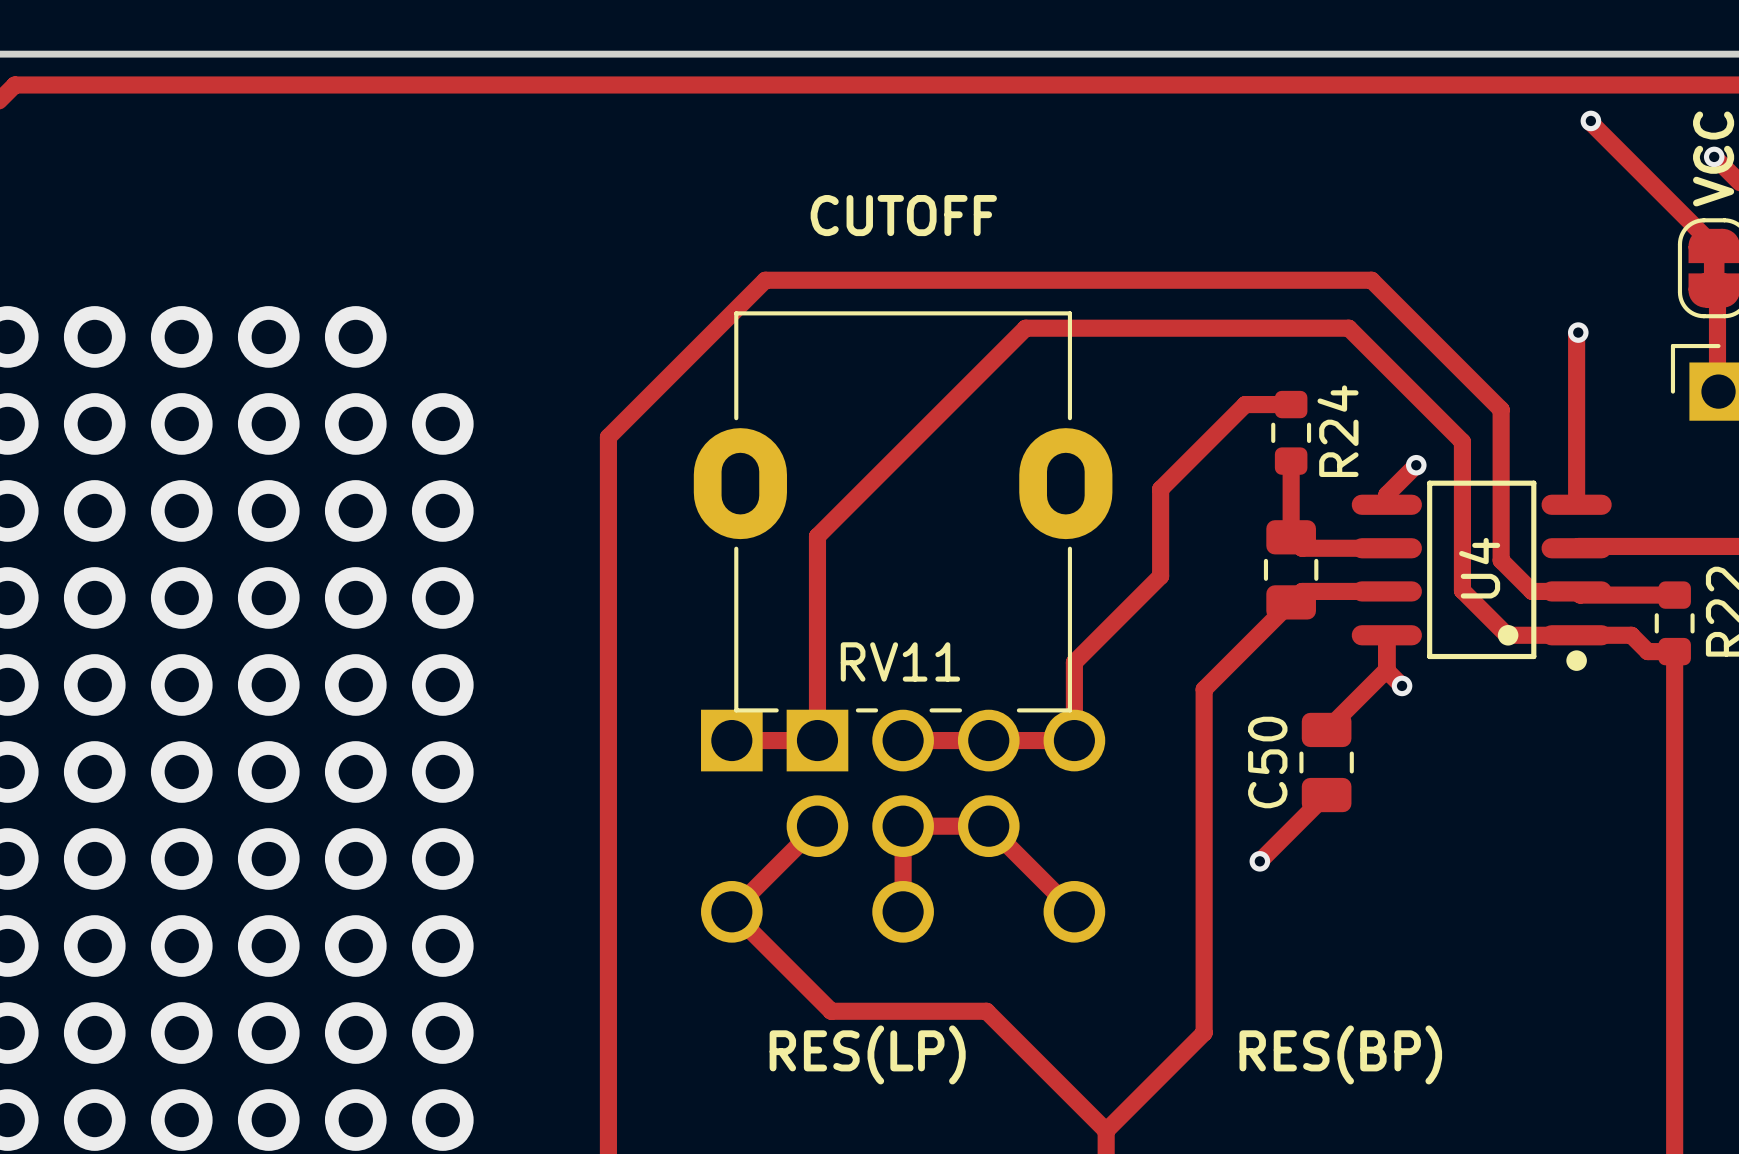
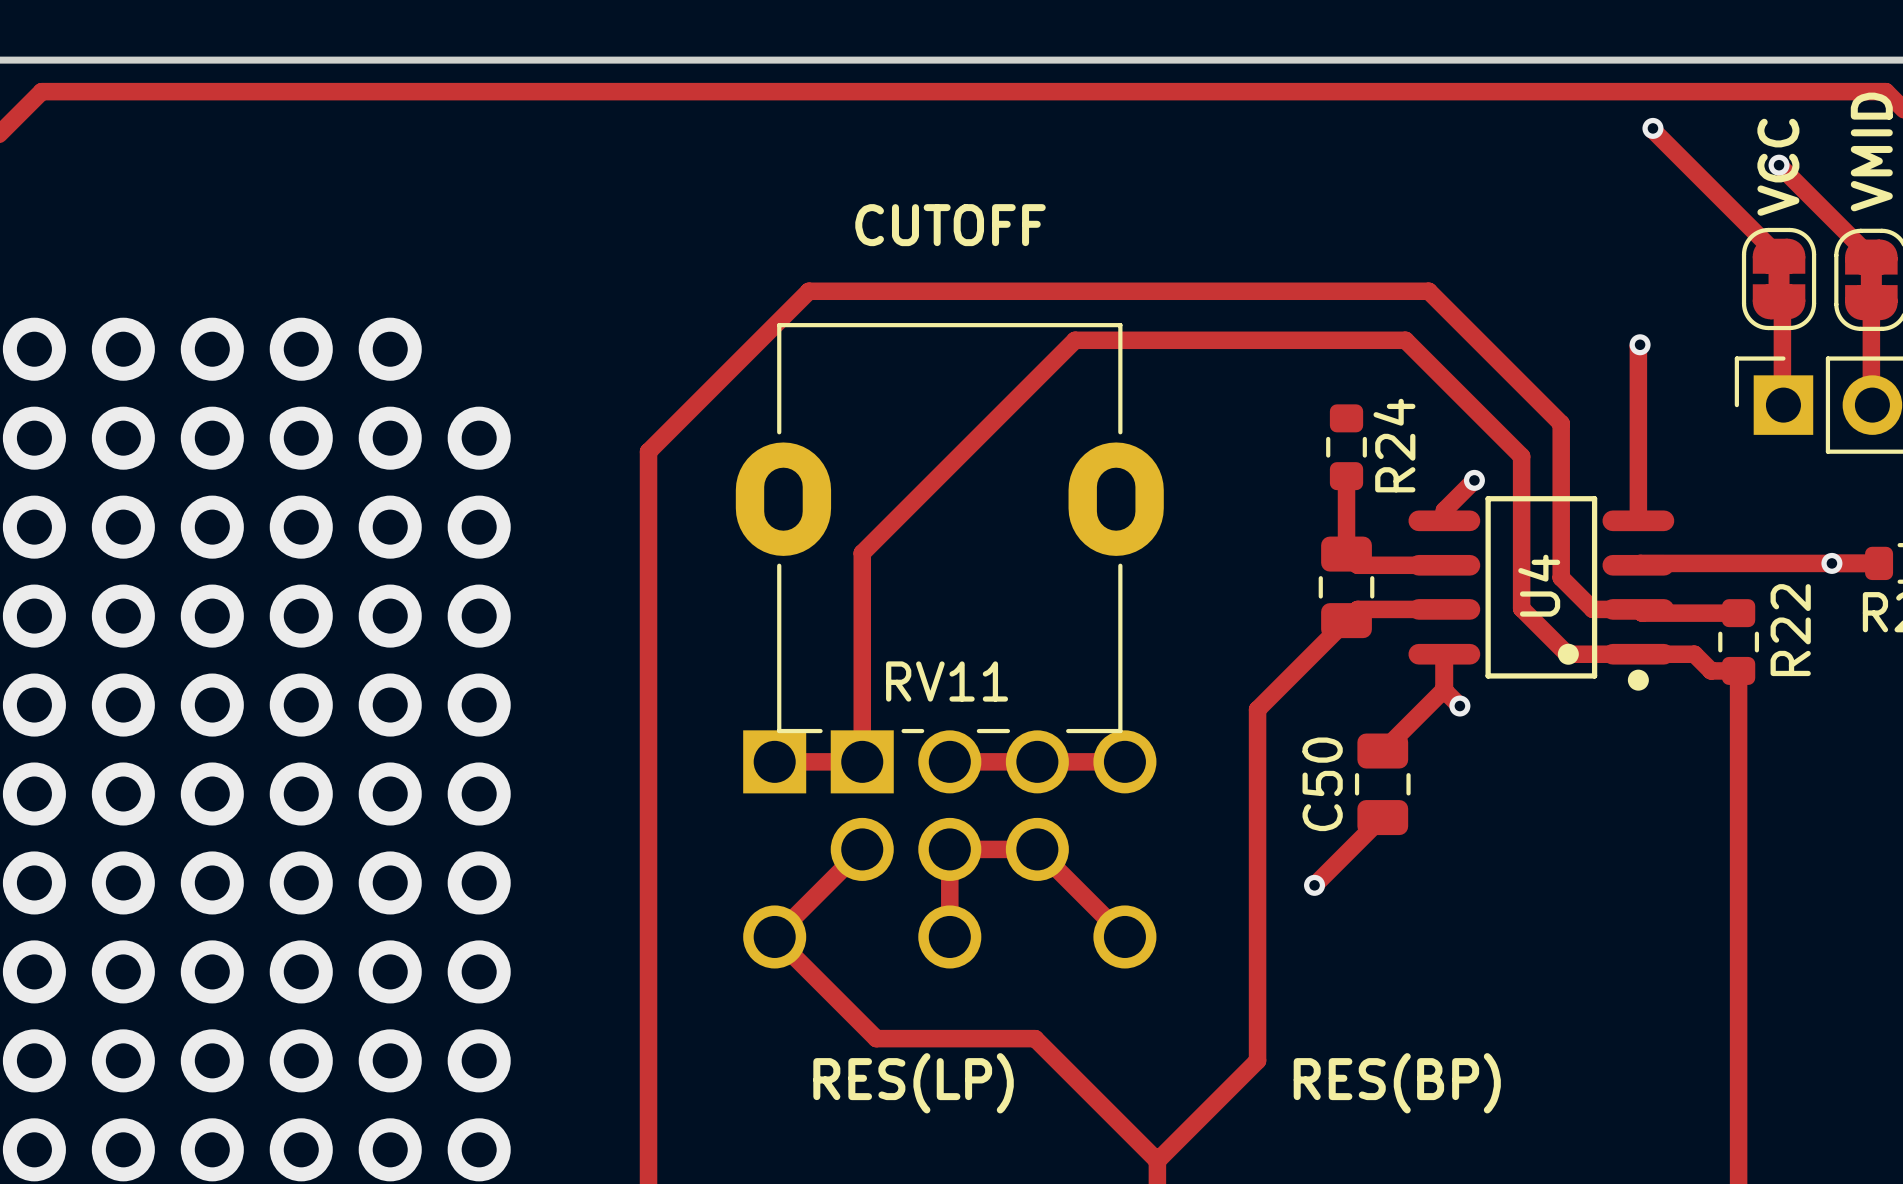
track: (1291, 404) (1245, 404) (1160, 489) (1160, 576) (1074, 662) (1074, 740) -> none

